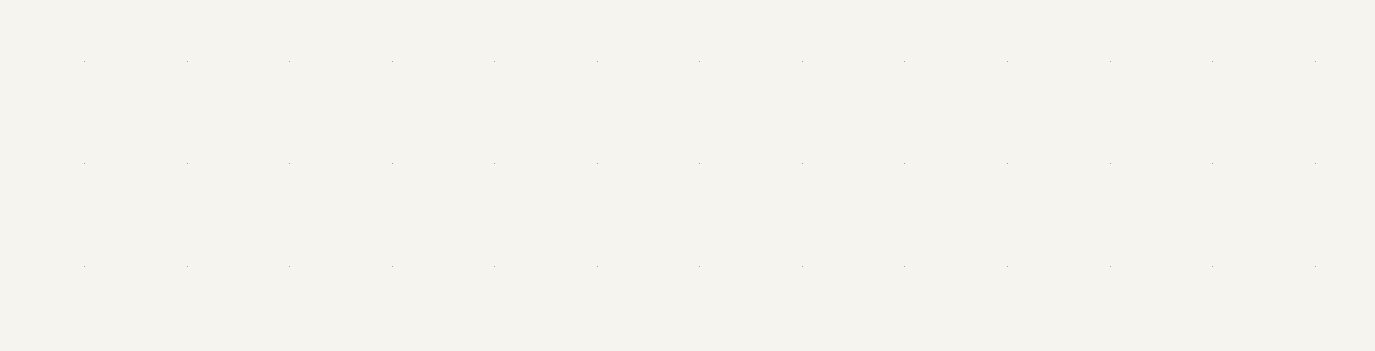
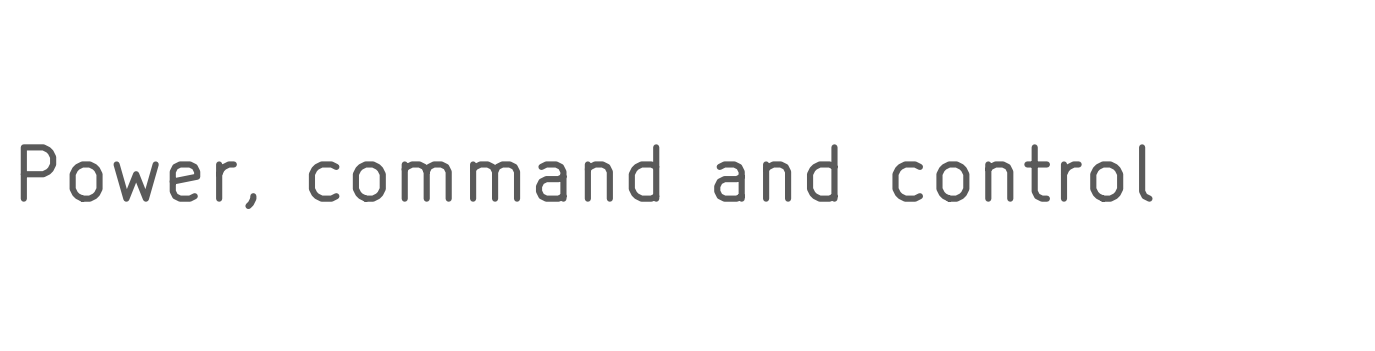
text: none -> Power, command and control (586, 176)

